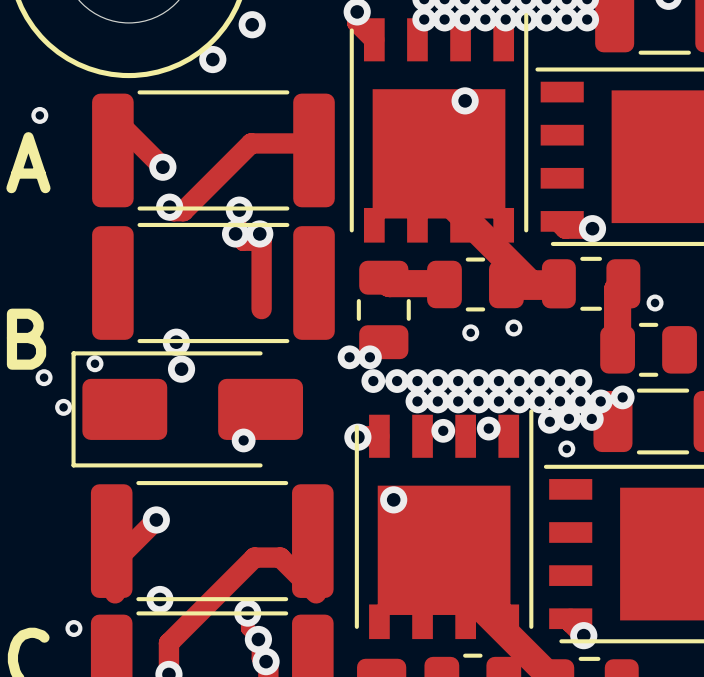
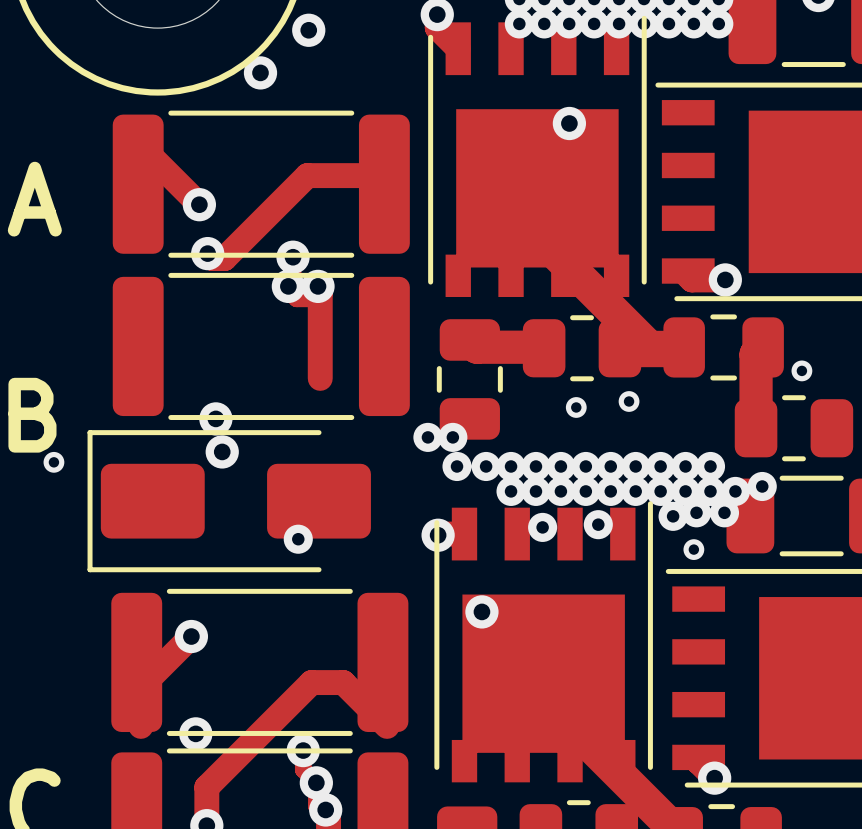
via: (39, 115) -> none
via: (94, 363) -> none
via: (63, 407) -> none
via: (73, 628) -> none

